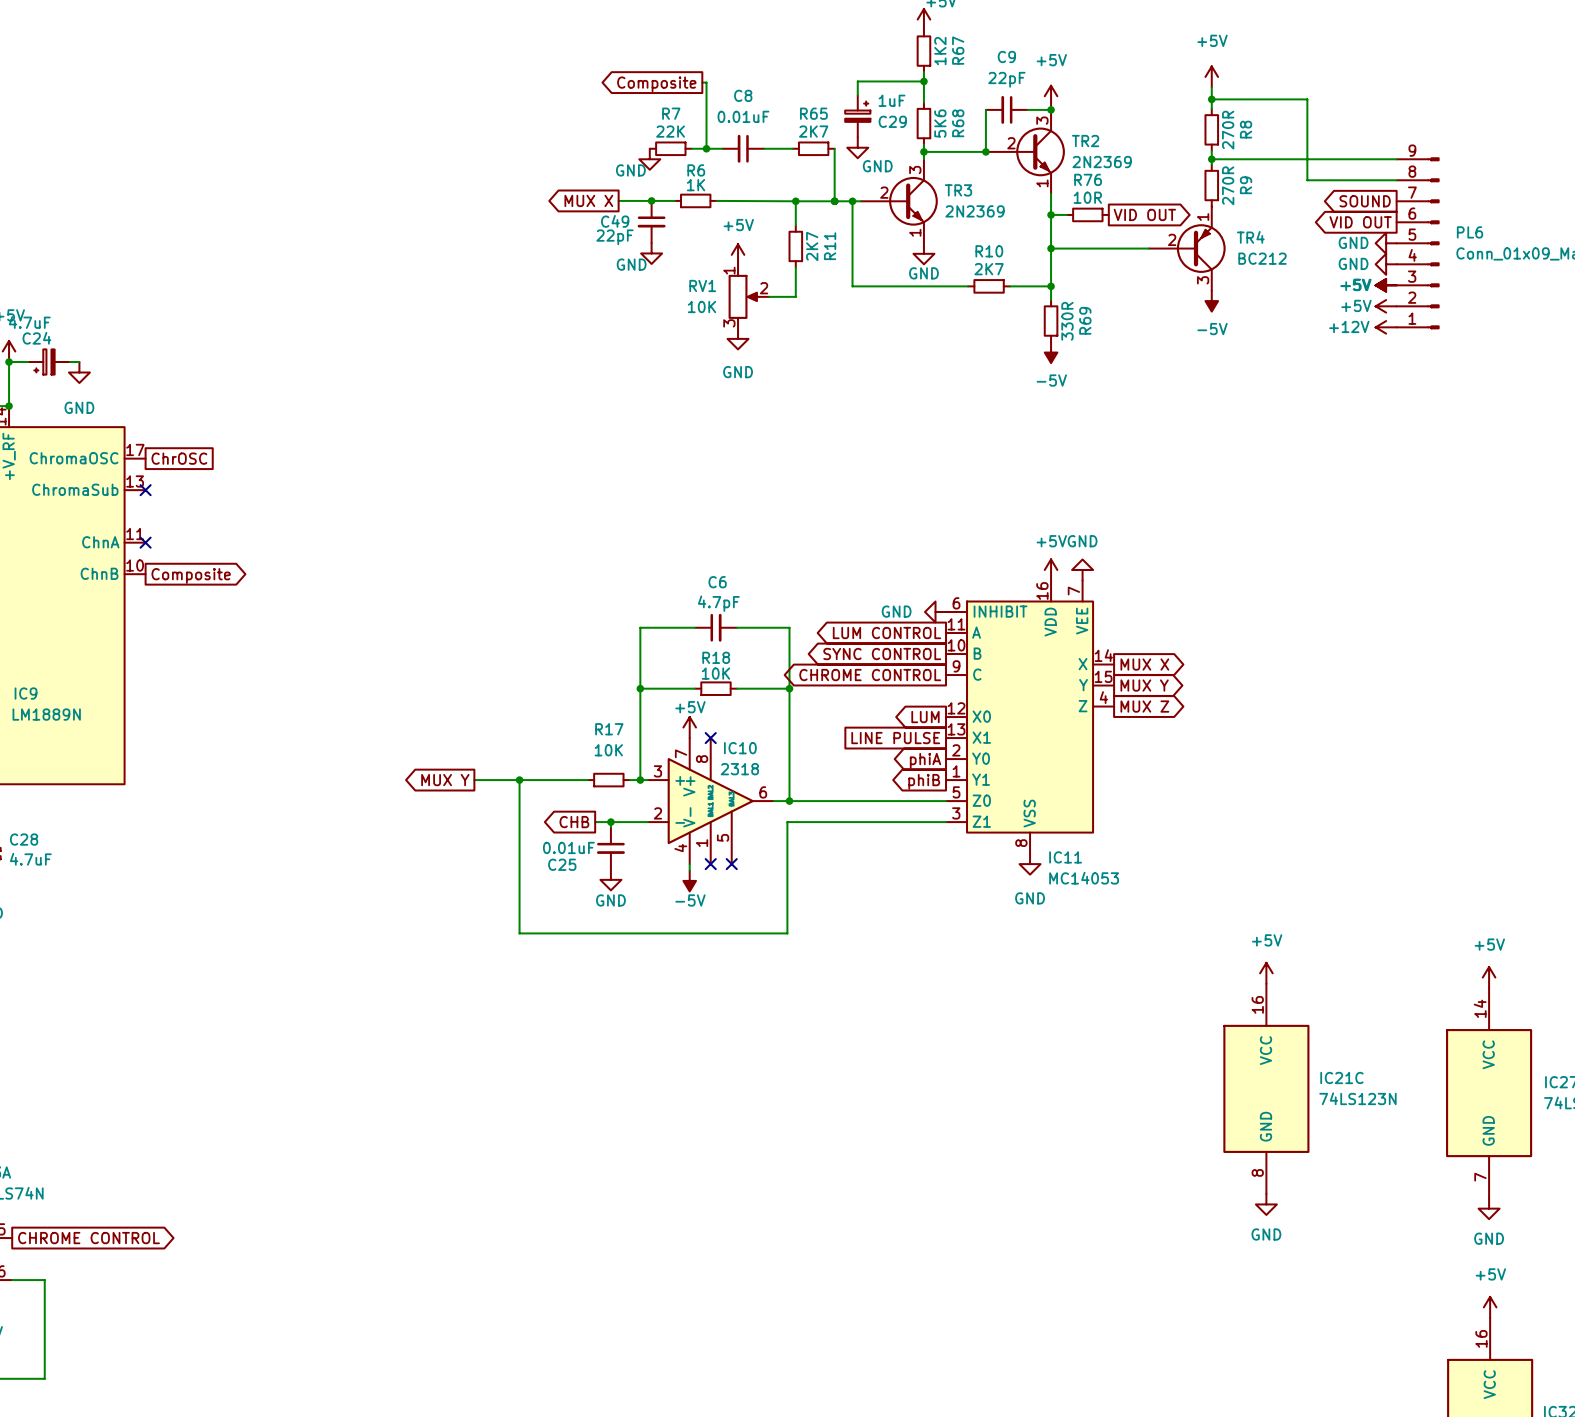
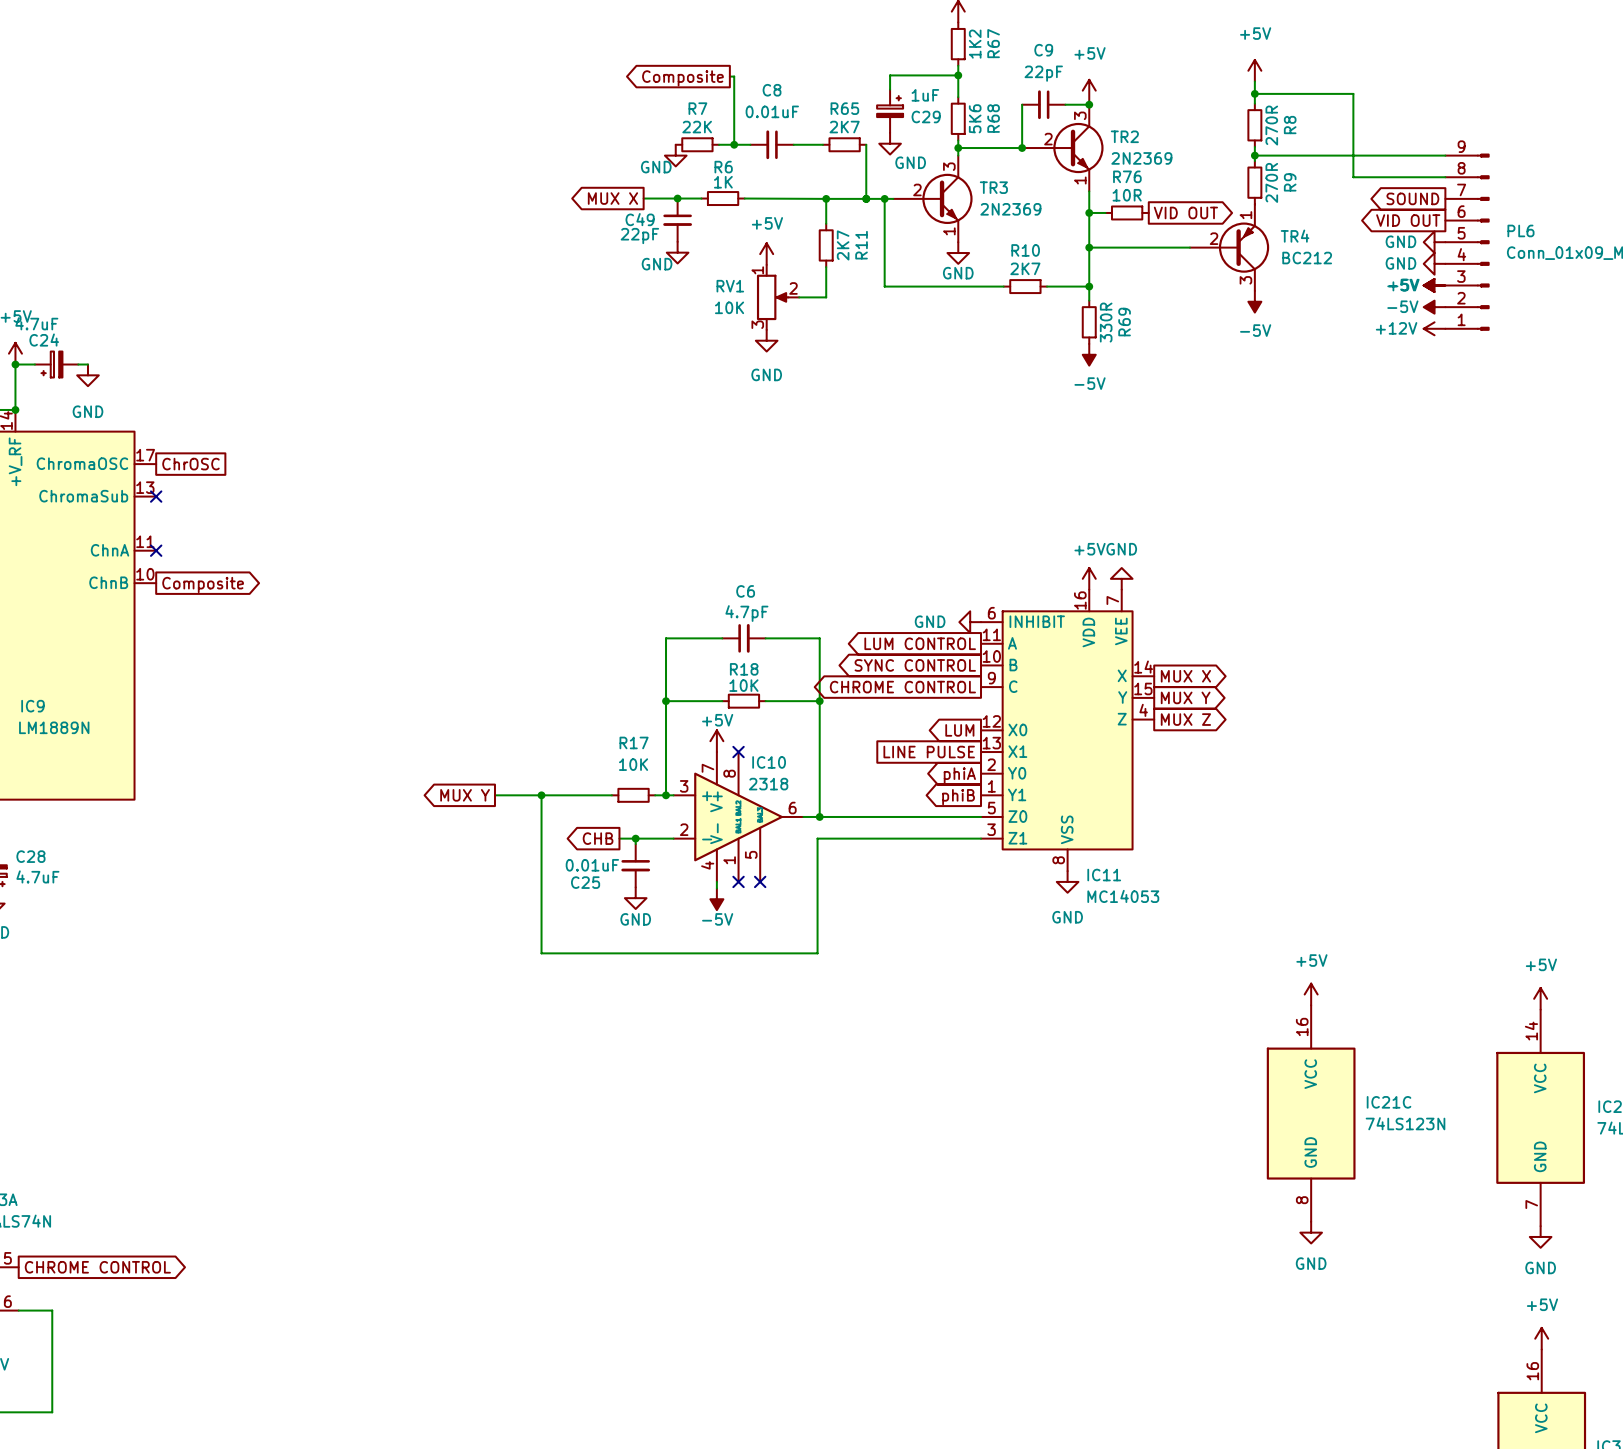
power symbol: +5V (1386, 306) -> -5V (1434, 307)

